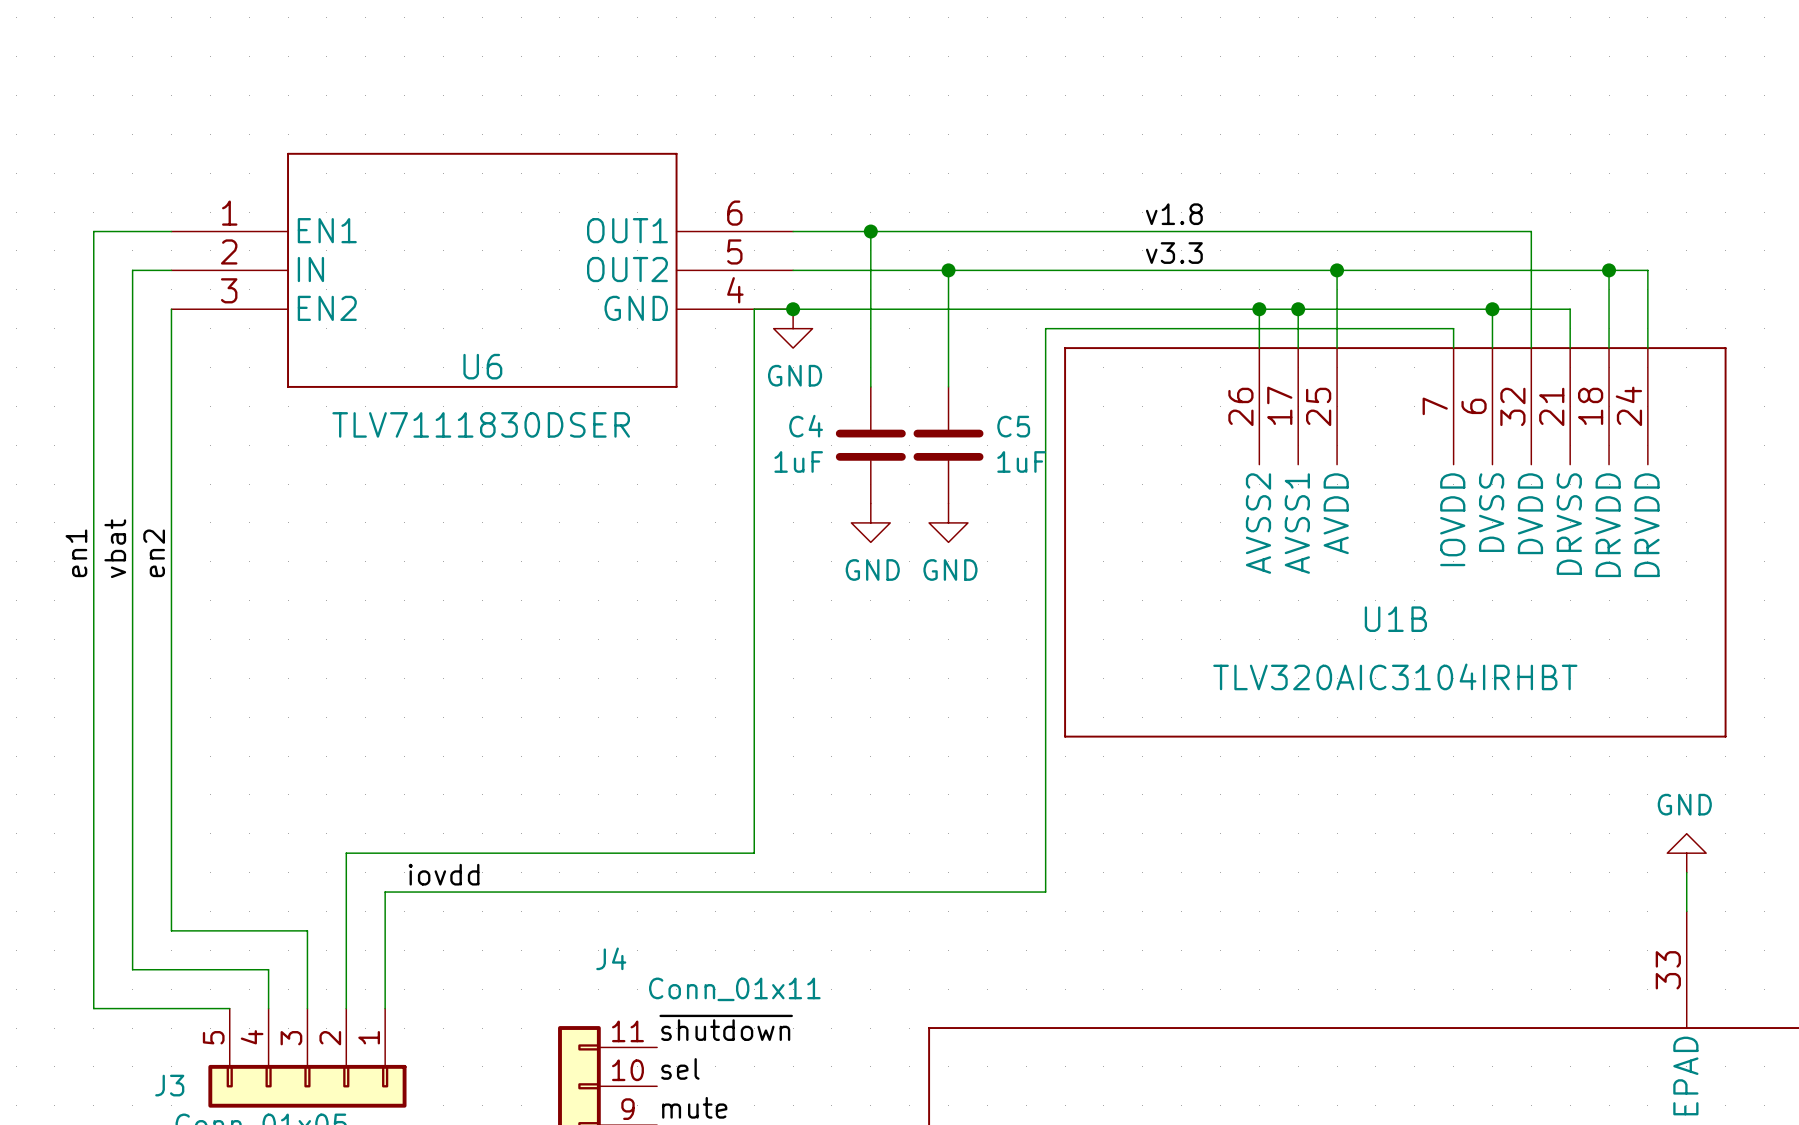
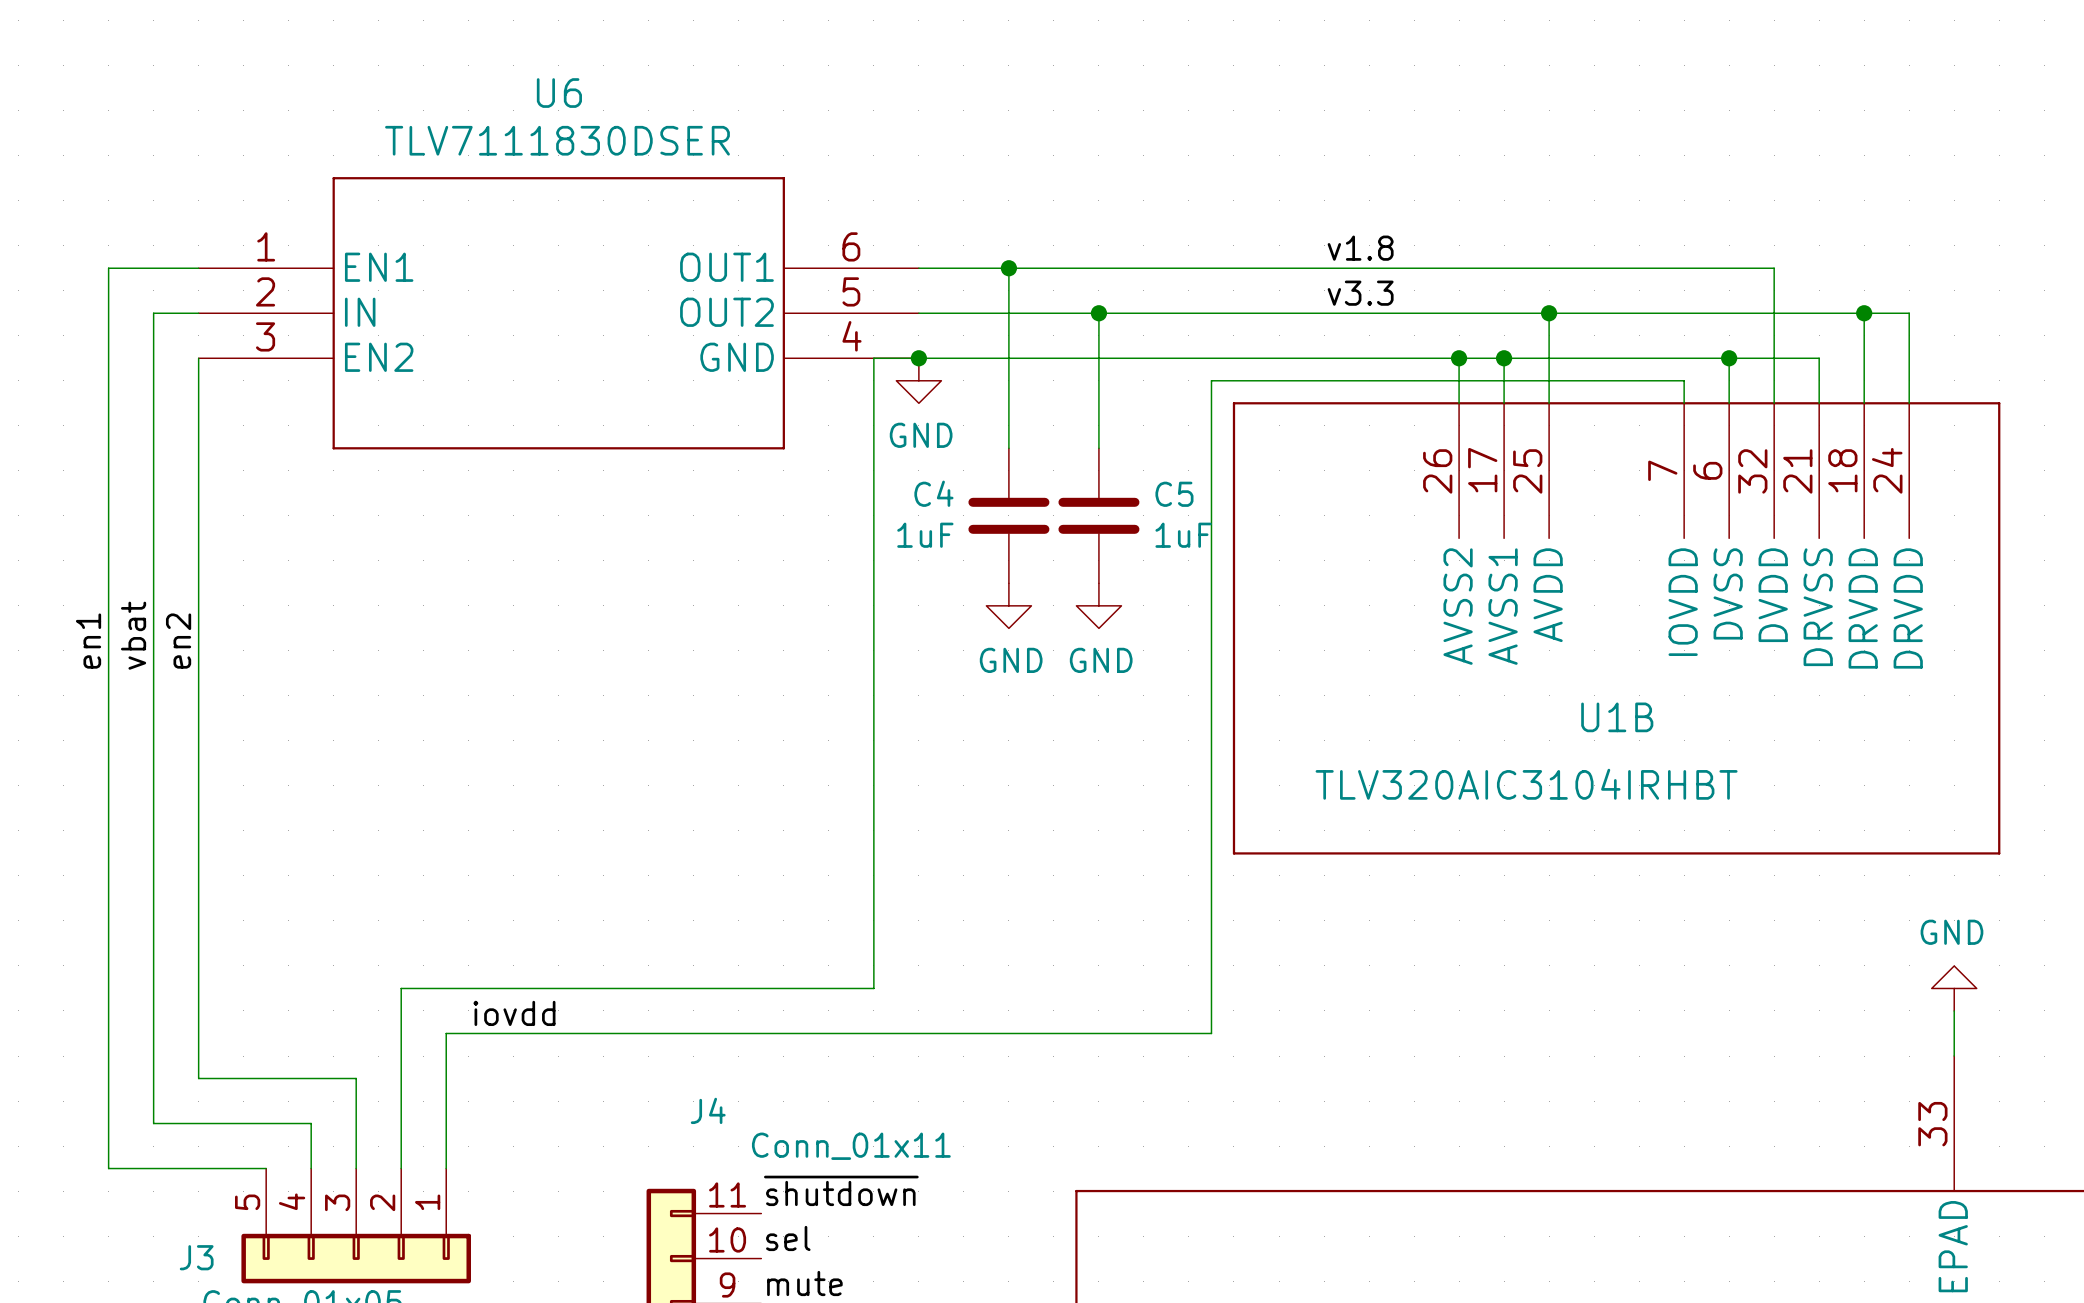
U6 name position: U6 (482, 366) -> U6 (559, 93)
U6 value position: TLV7111830DSER (481, 424) -> TLV7111830DSER (557, 140)
U1B value position: TLV320AIC3104IRHBT (1395, 676) -> TLV320AIC3104IRHBT (1526, 784)

